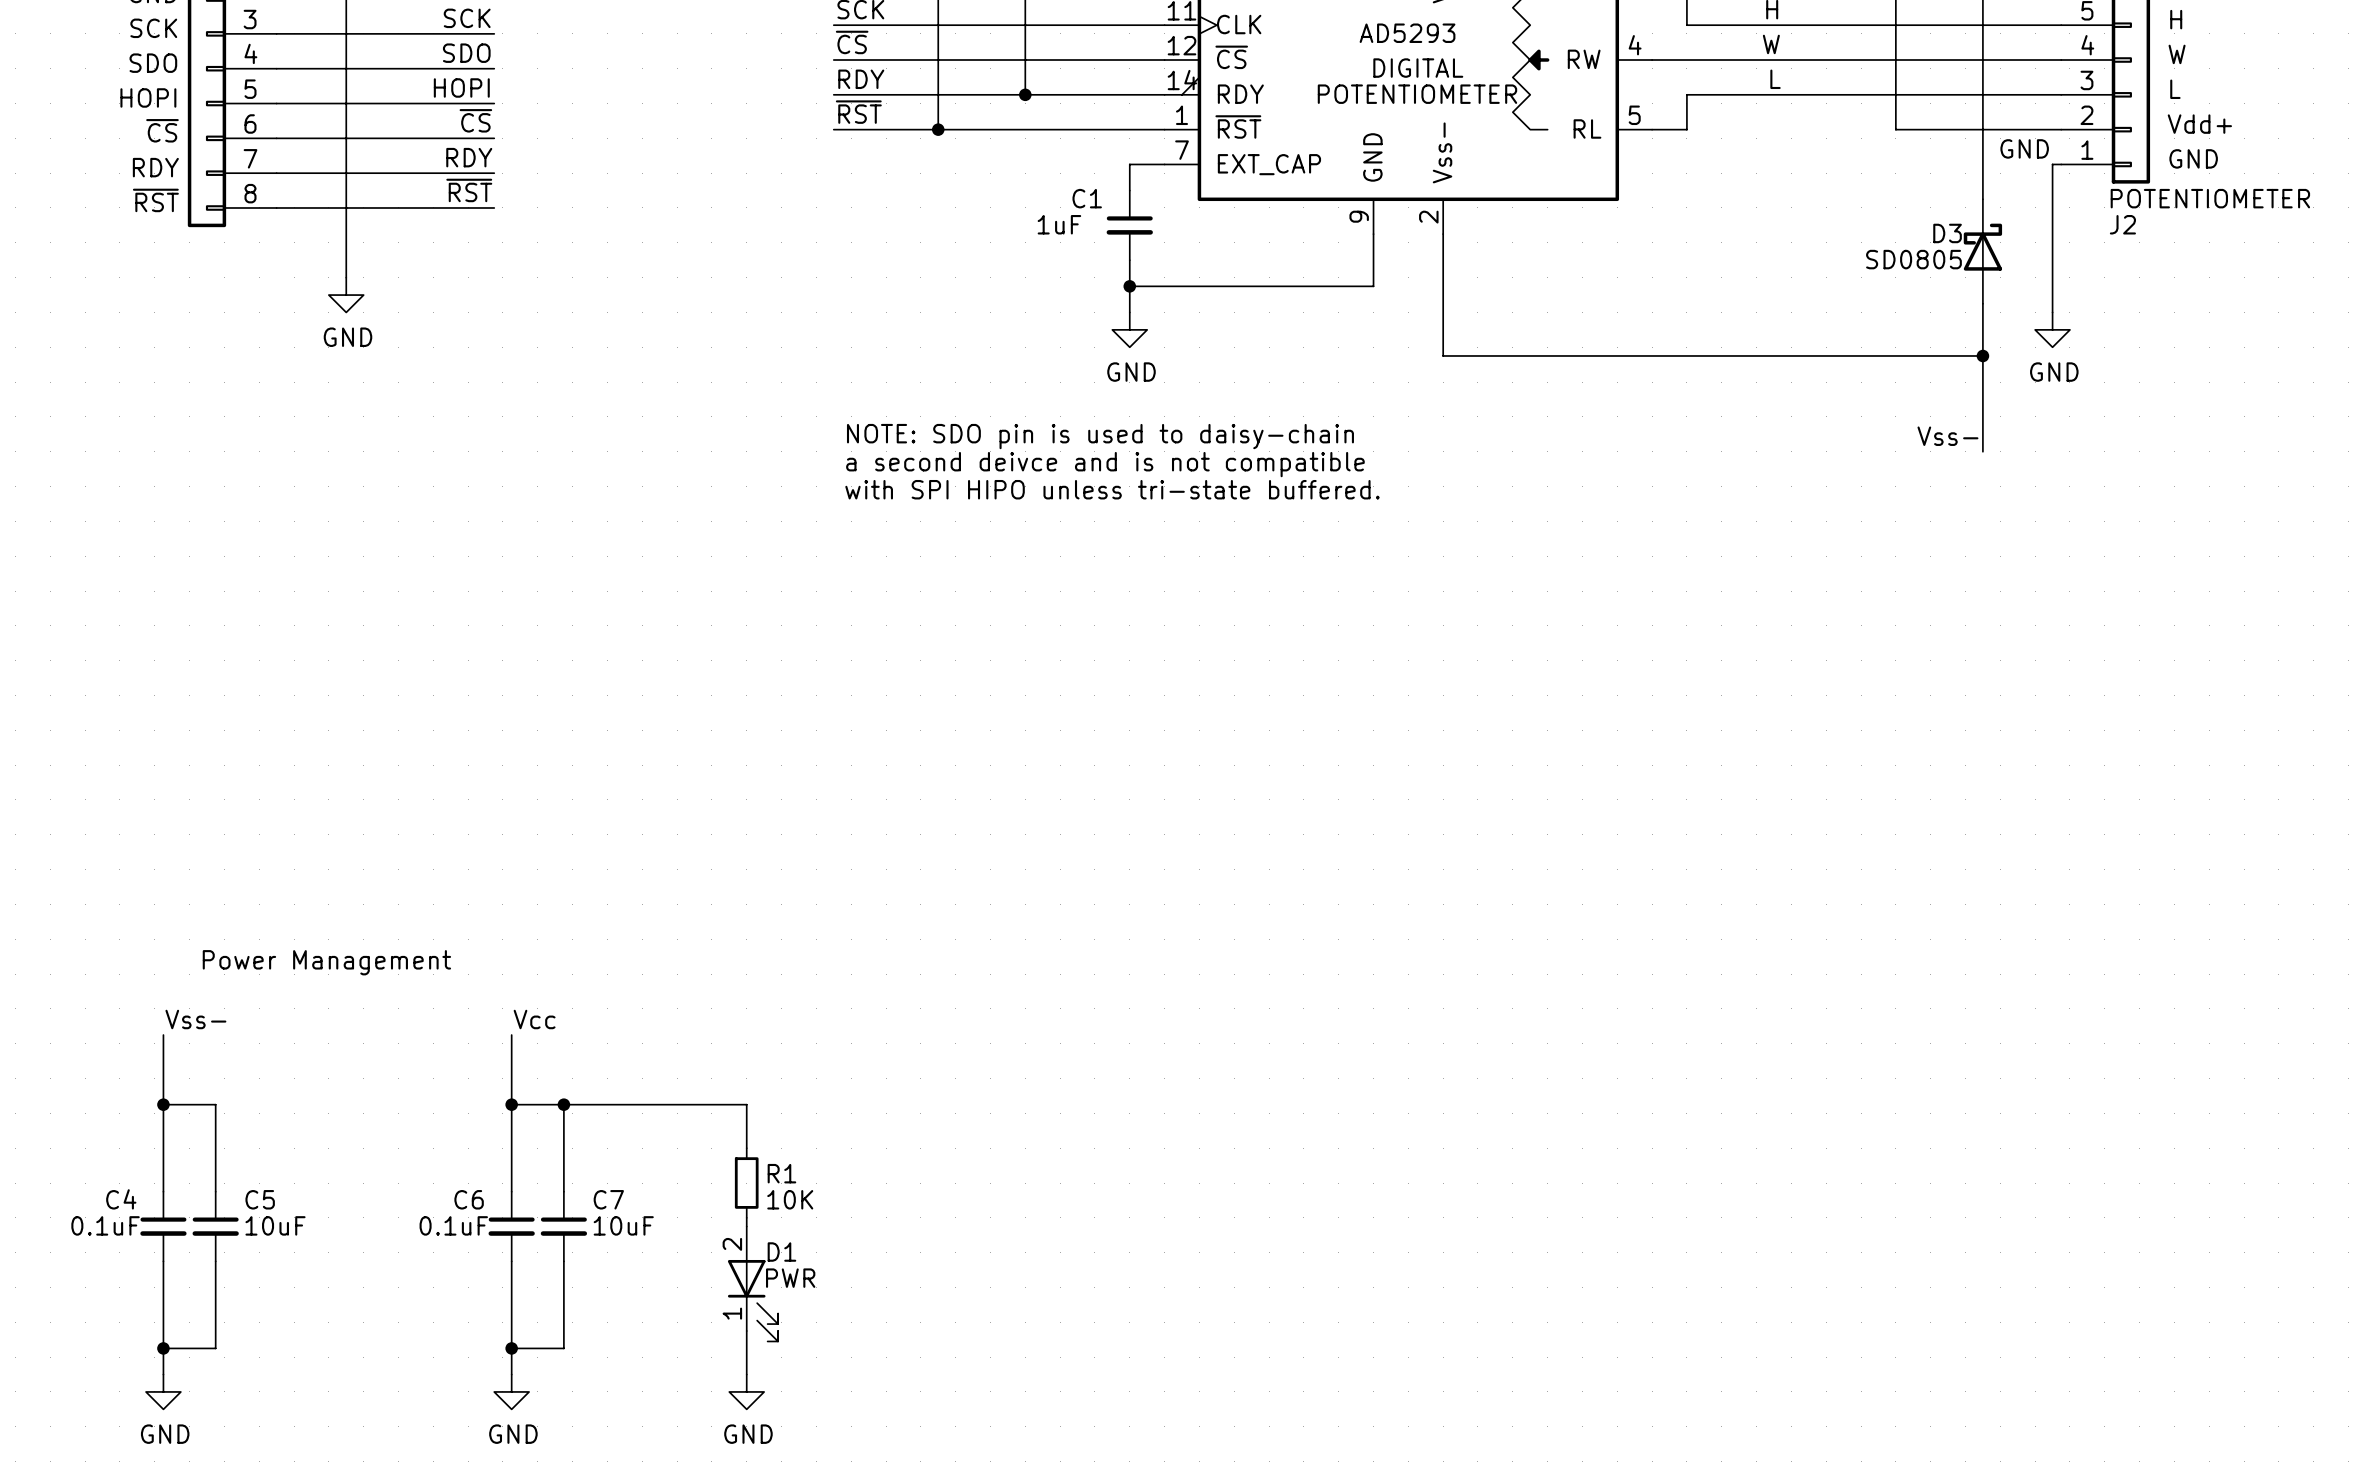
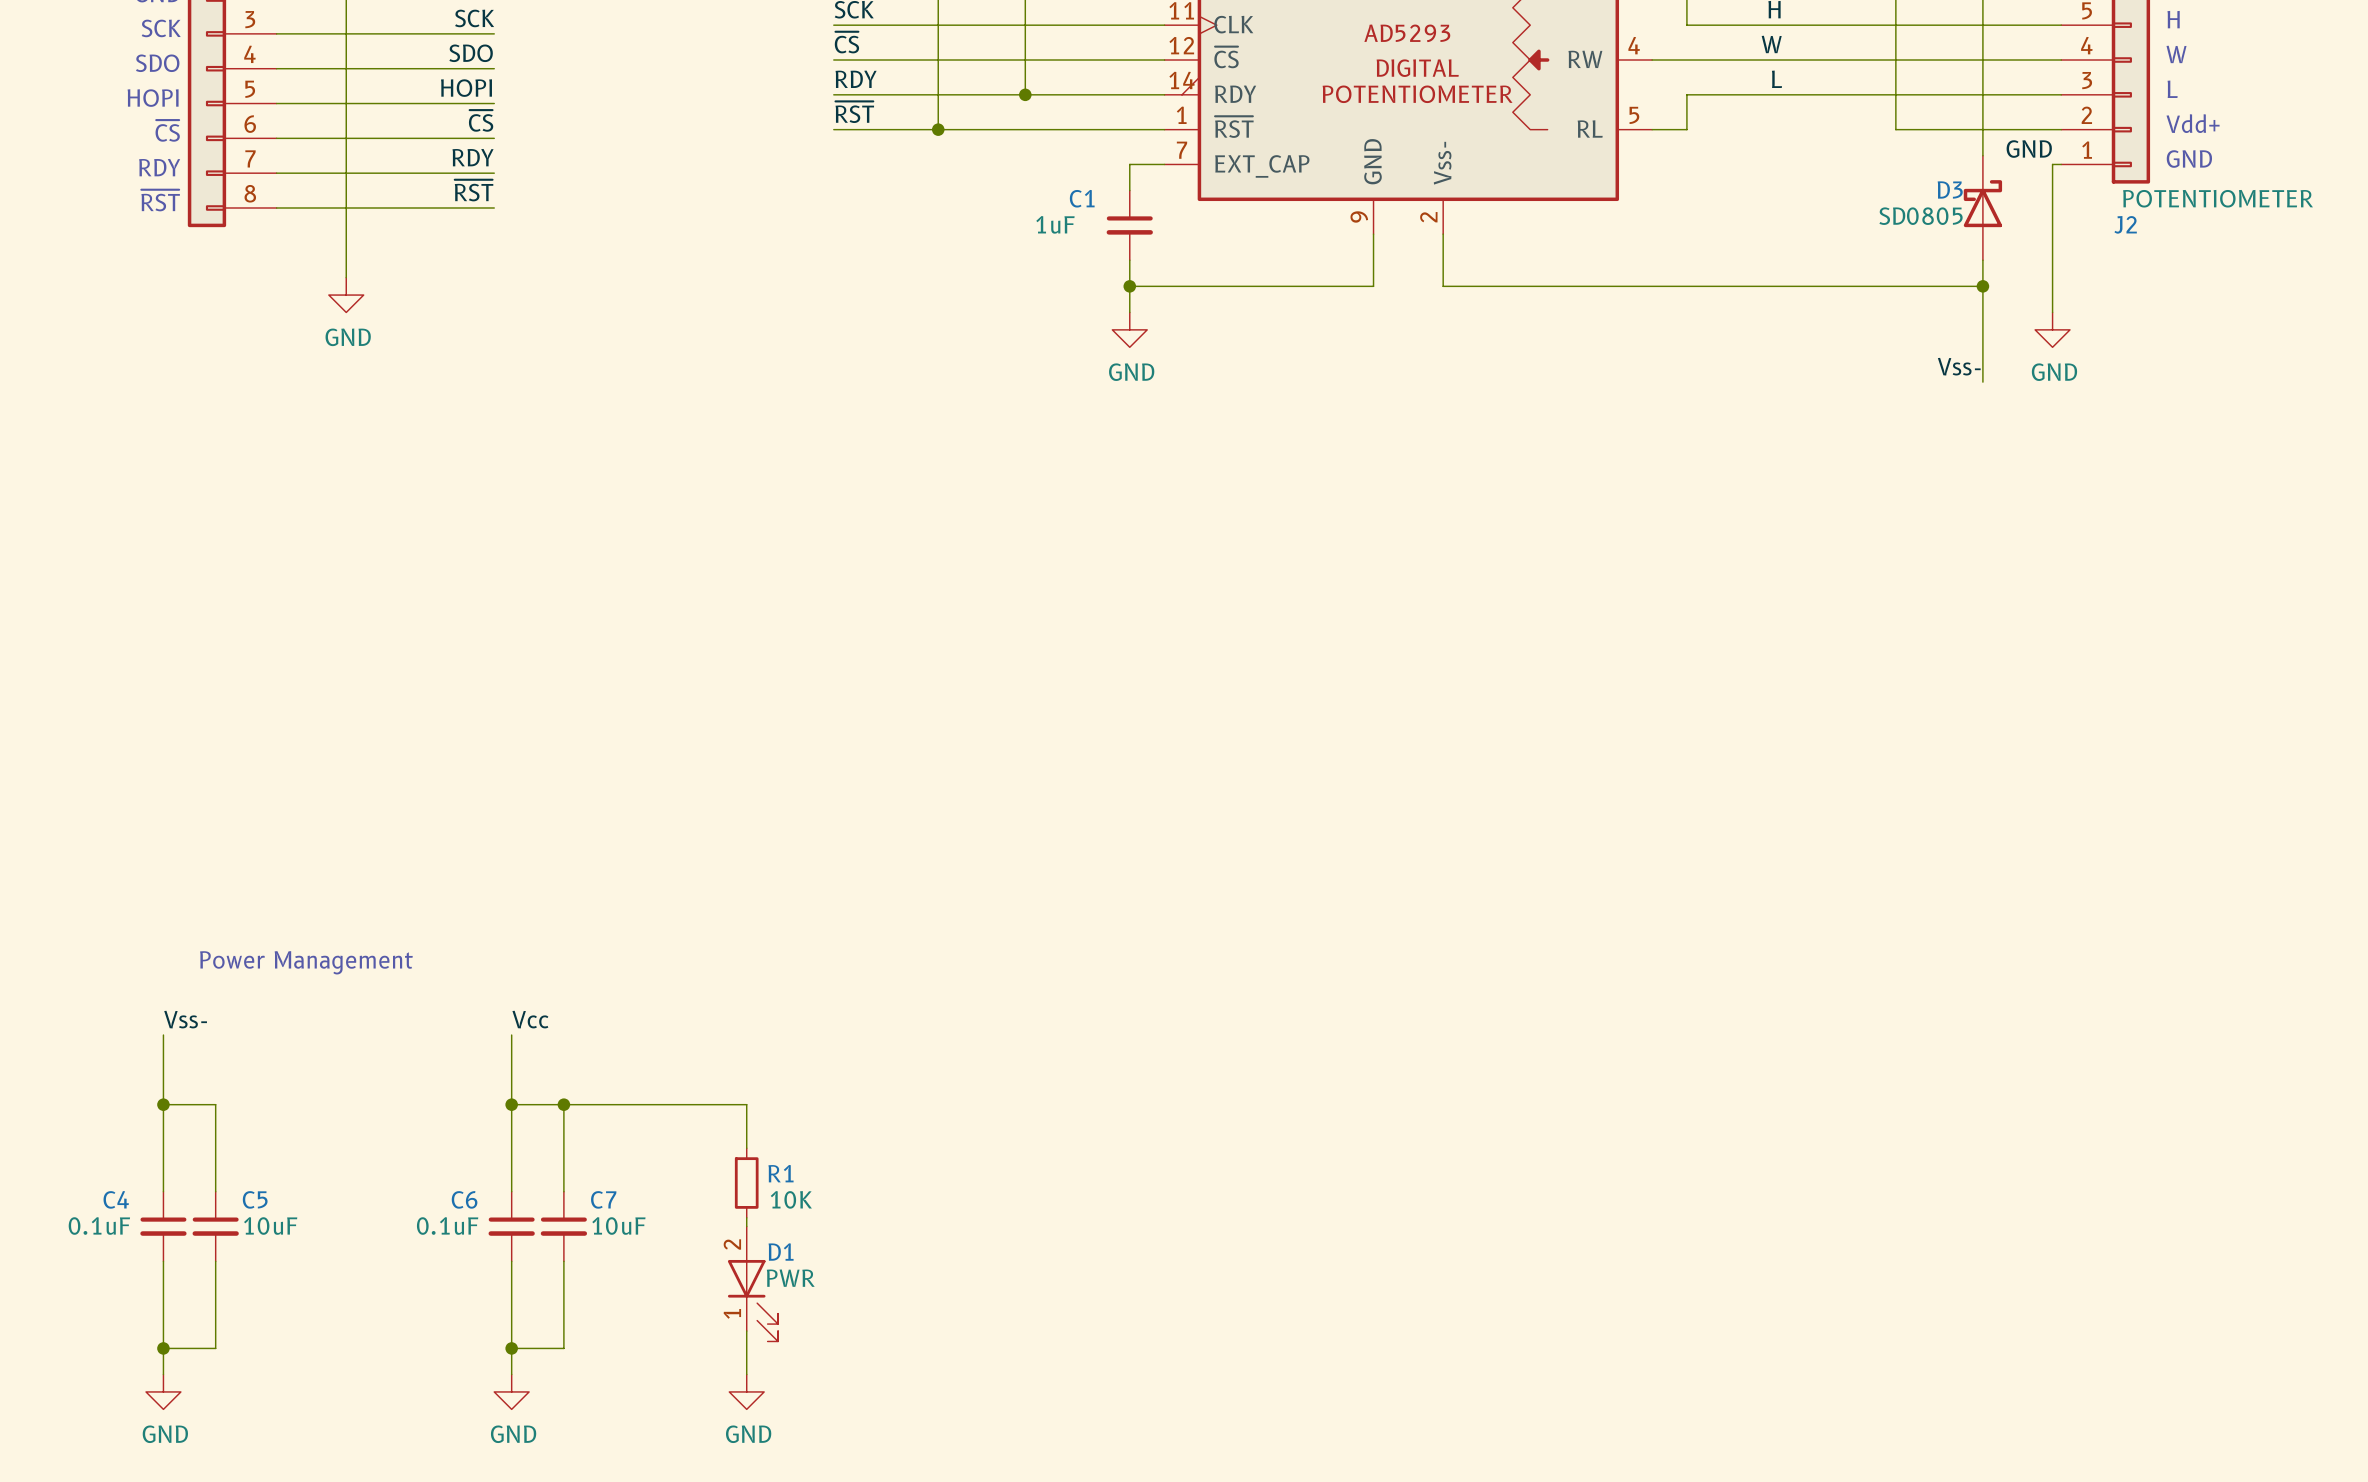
D3 position: (1982, 251) -> (1982, 207)
wire: (1443, 286) (1443, 355) (1982, 355) -> (1443, 286) (1982, 286)
junction position: (1982, 355) -> (1982, 286)
wire: (1982, 382) (1982, 451) -> none
text: NOTE: SDO pin is used to daisy-chain (1100, 436) -> none
label position: Vss- (1947, 436) -> Vss- (1959, 366)
text: a second deivce and is not compatible (1105, 464) -> none
text: with SPI HIPO unless tri-state buffered. (1112, 489) -> none

